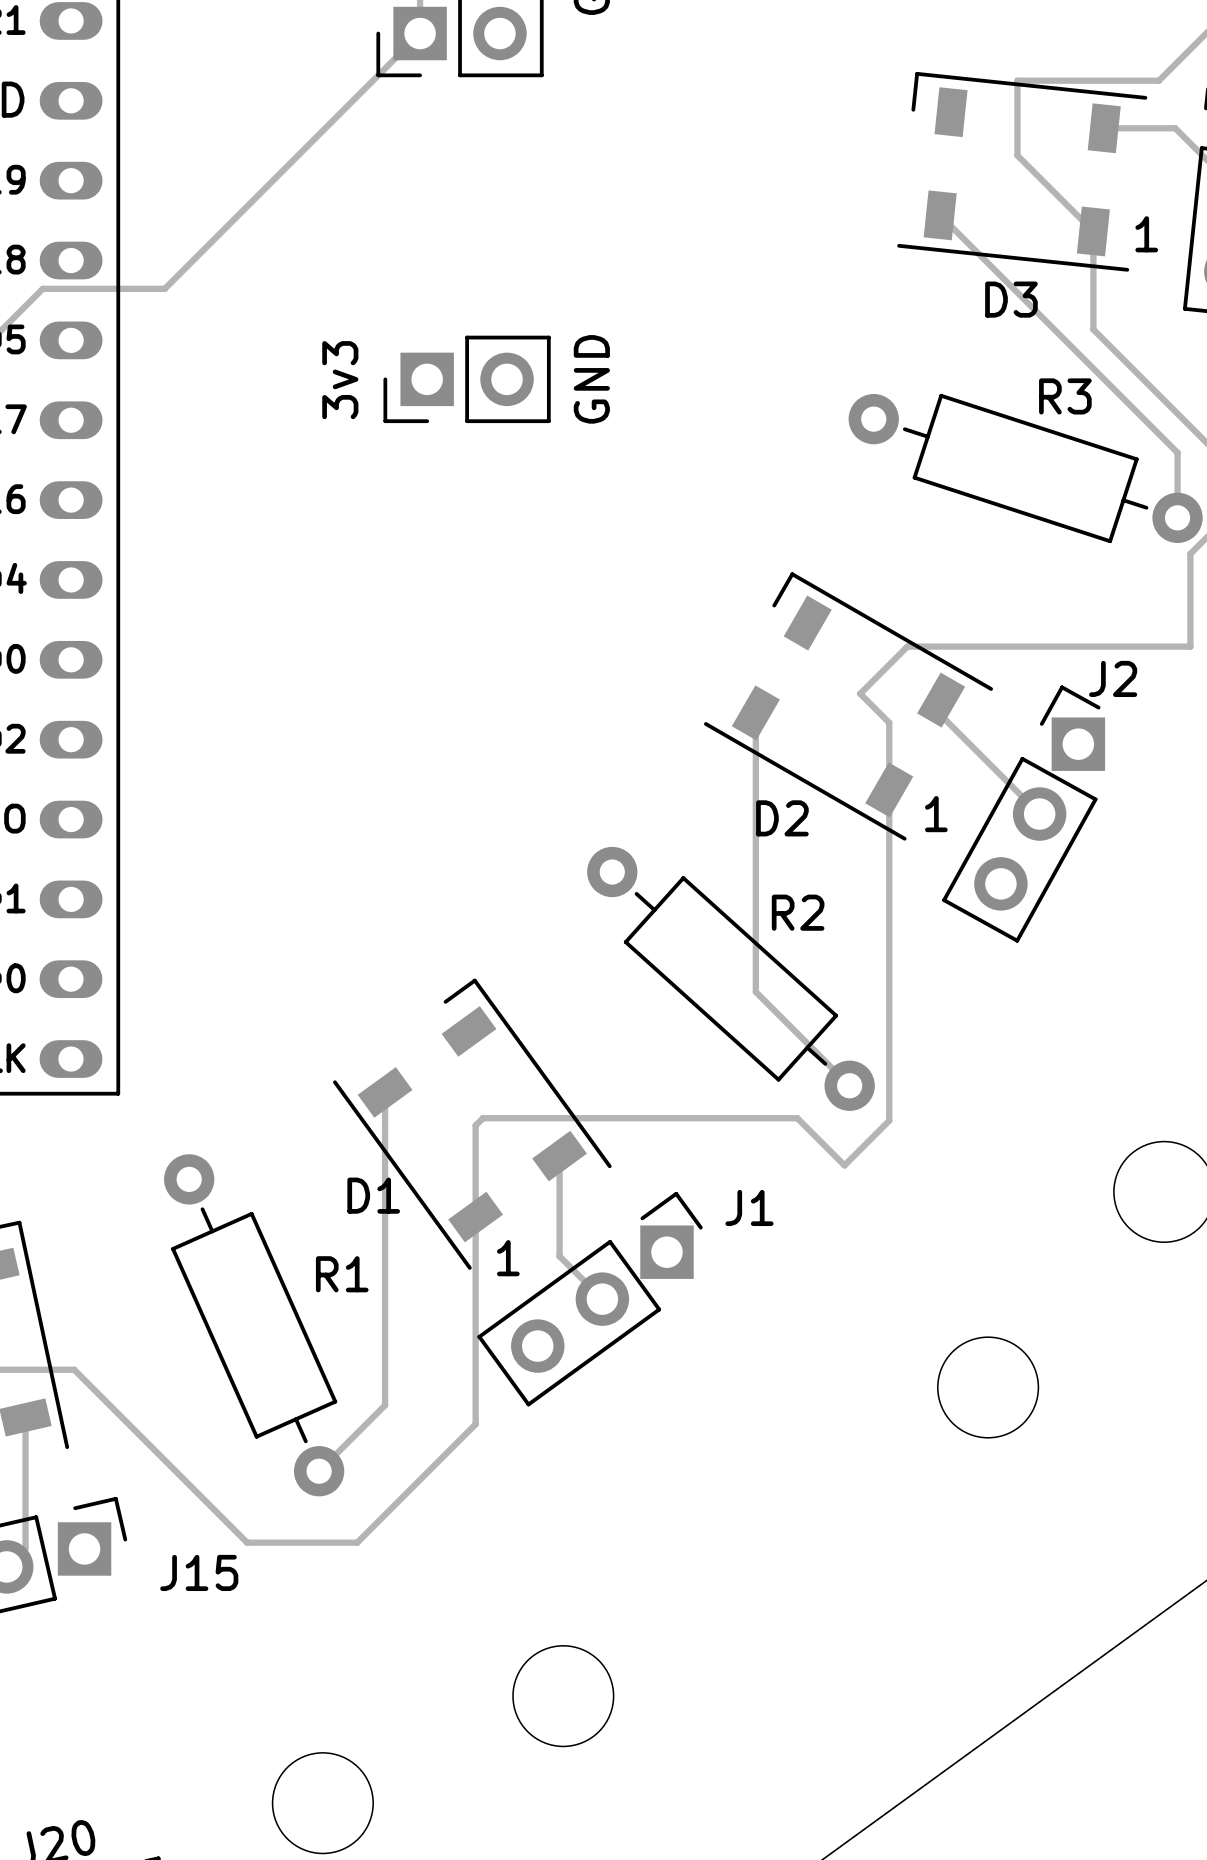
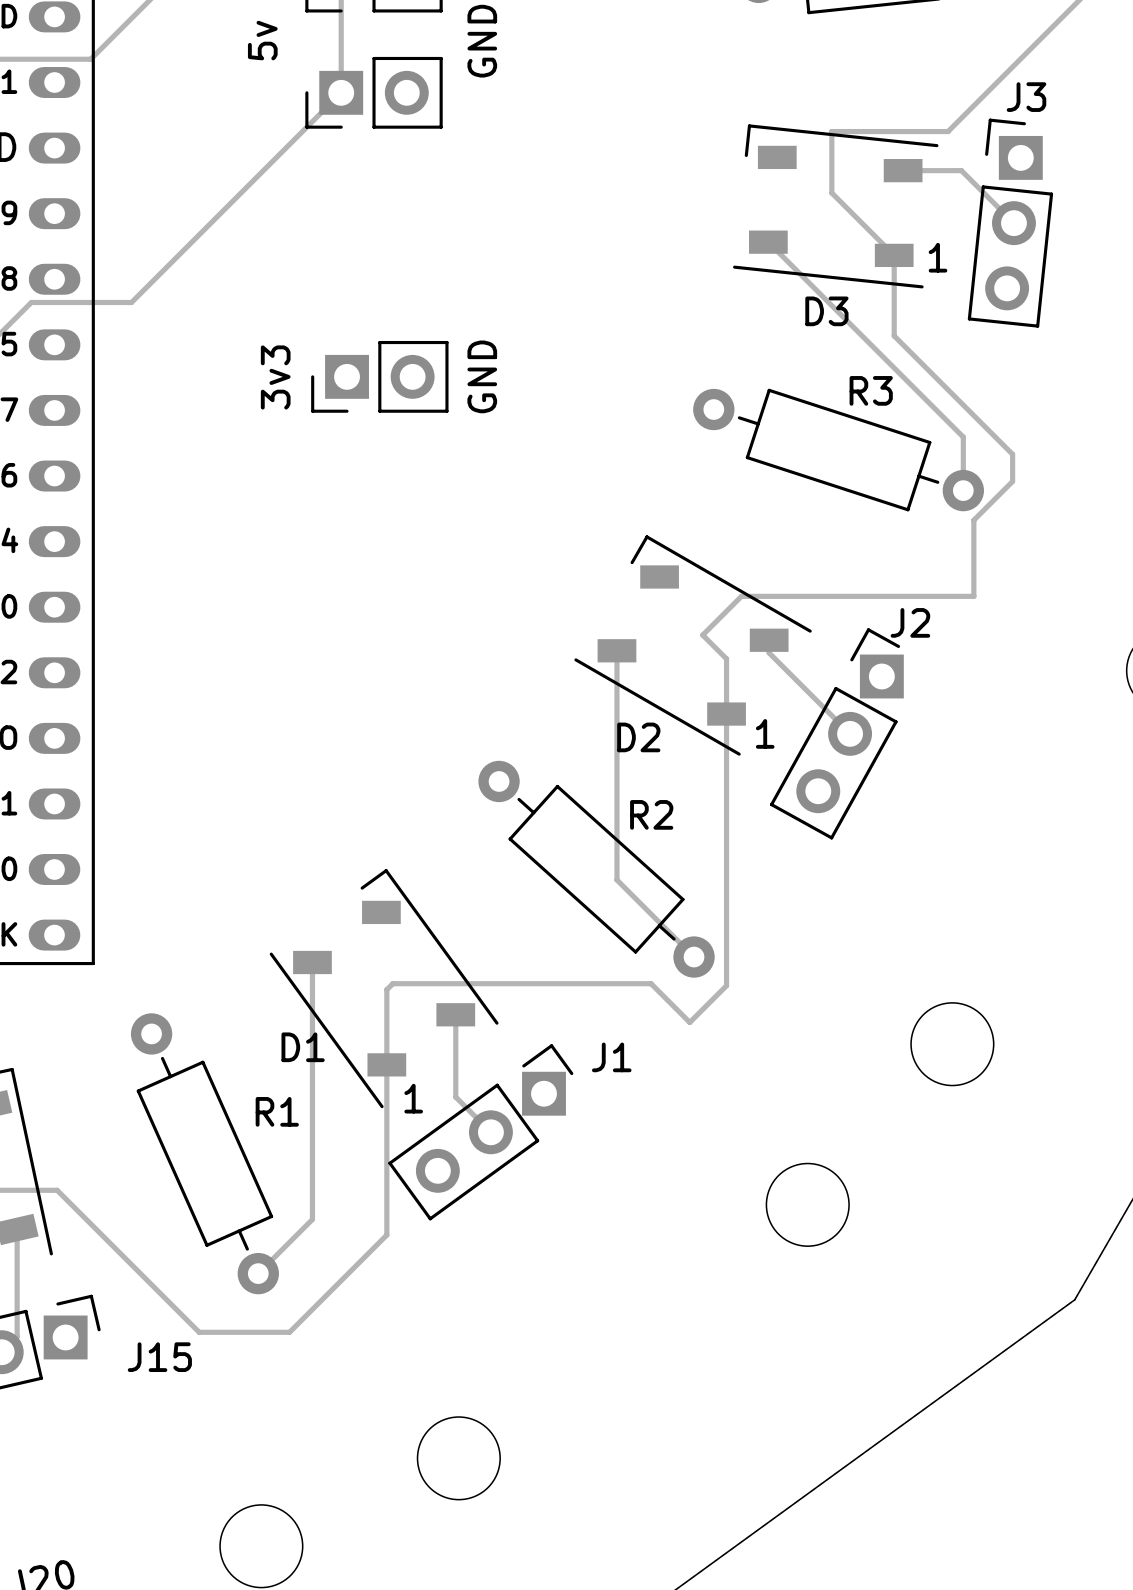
D3 footprint: [897, 71, 1148, 272] -> [733, 124, 939, 289]
D2 footprint: [703, 572, 994, 841] -> [574, 535, 812, 756]
D1 footprint: [333, 978, 612, 1270] -> [269, 869, 499, 1109]

